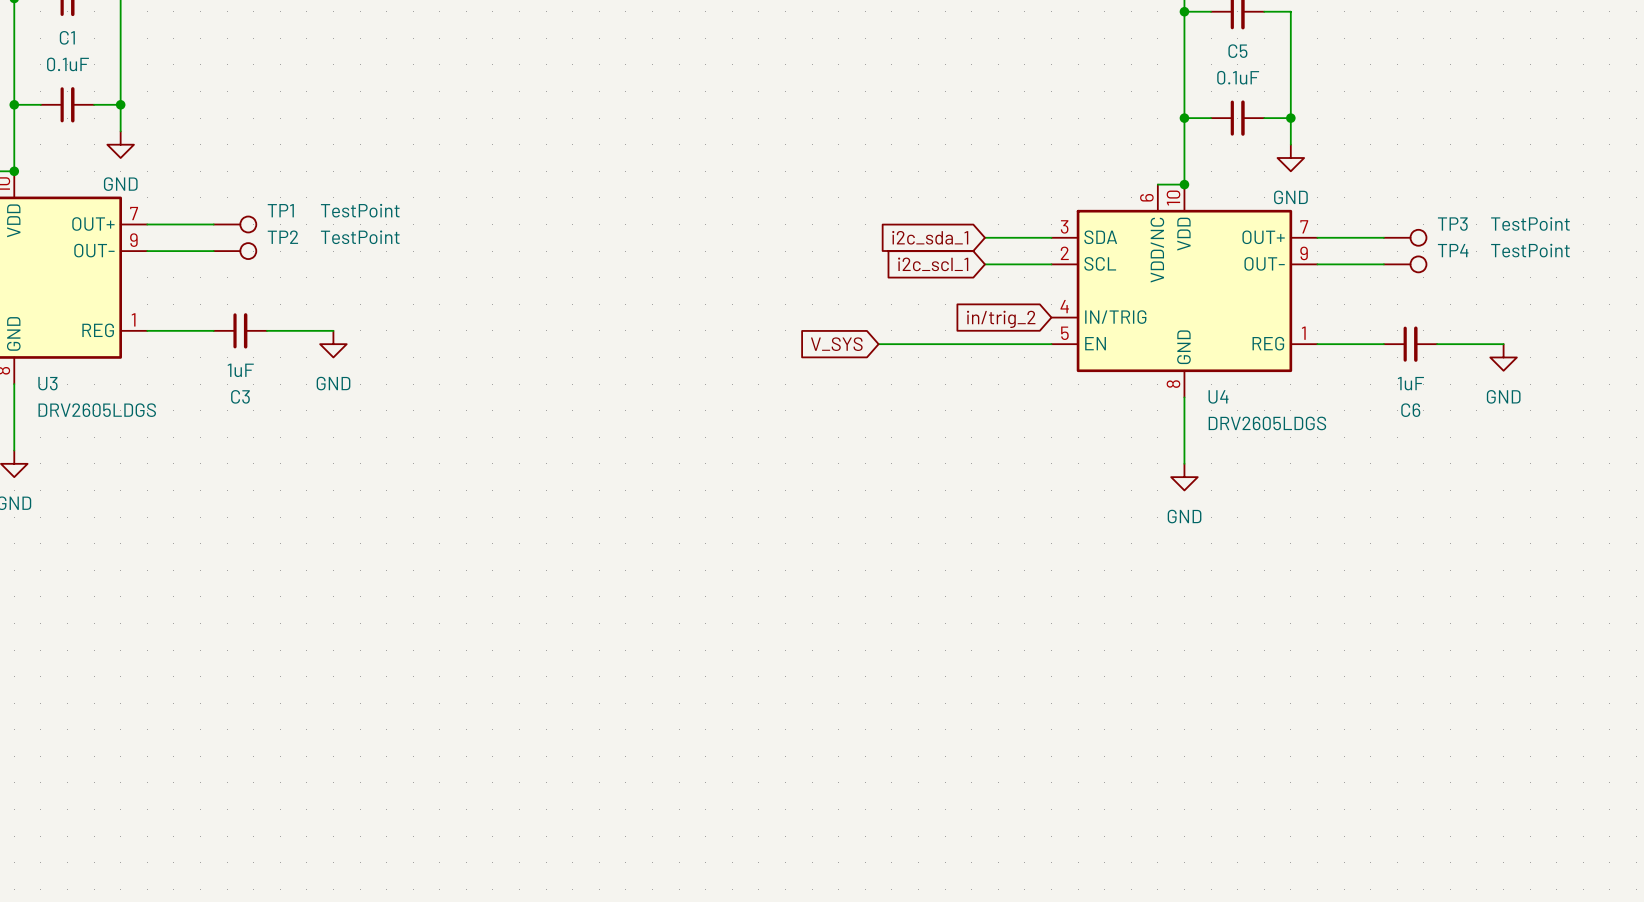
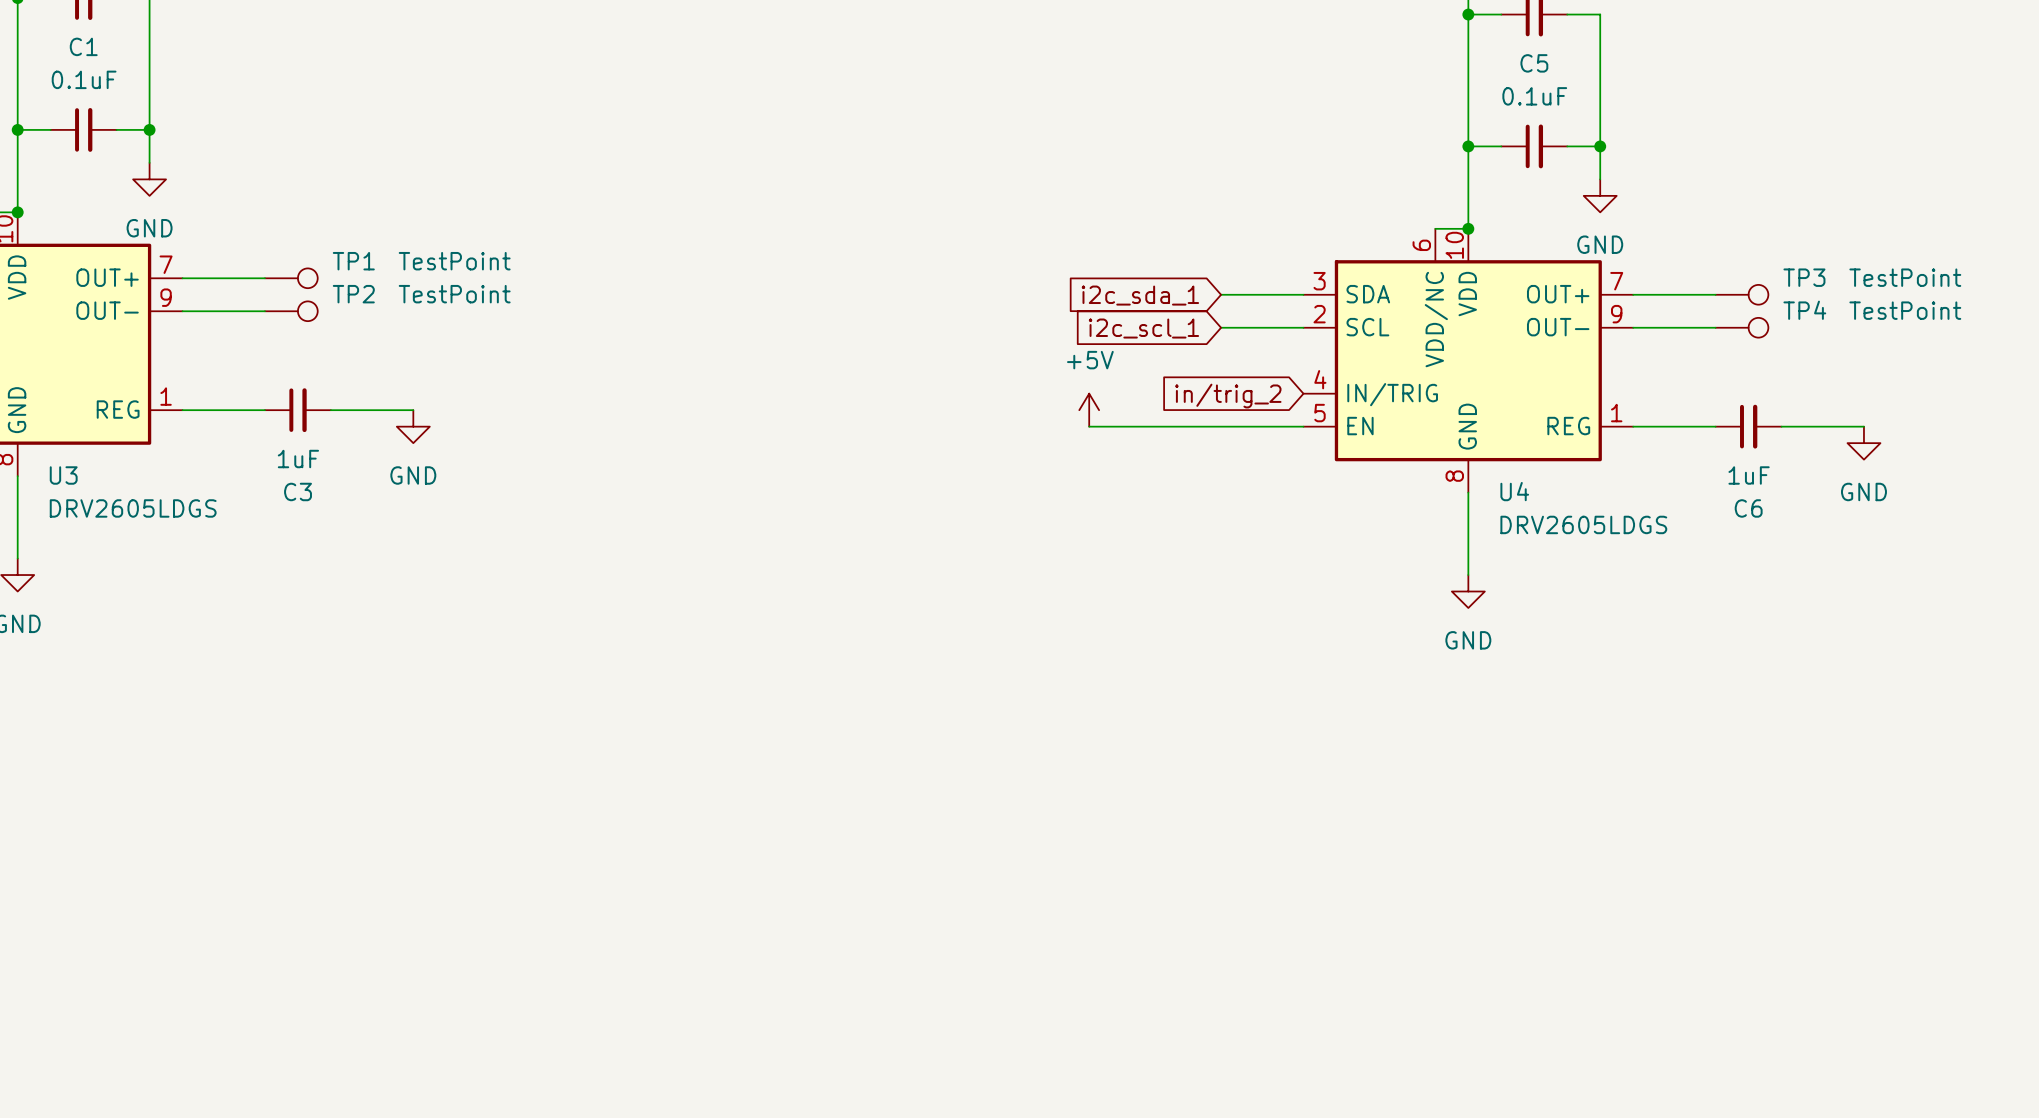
power symbol: none -> +5V (1089, 410)
global label: V_SYS (836, 344) -> none

